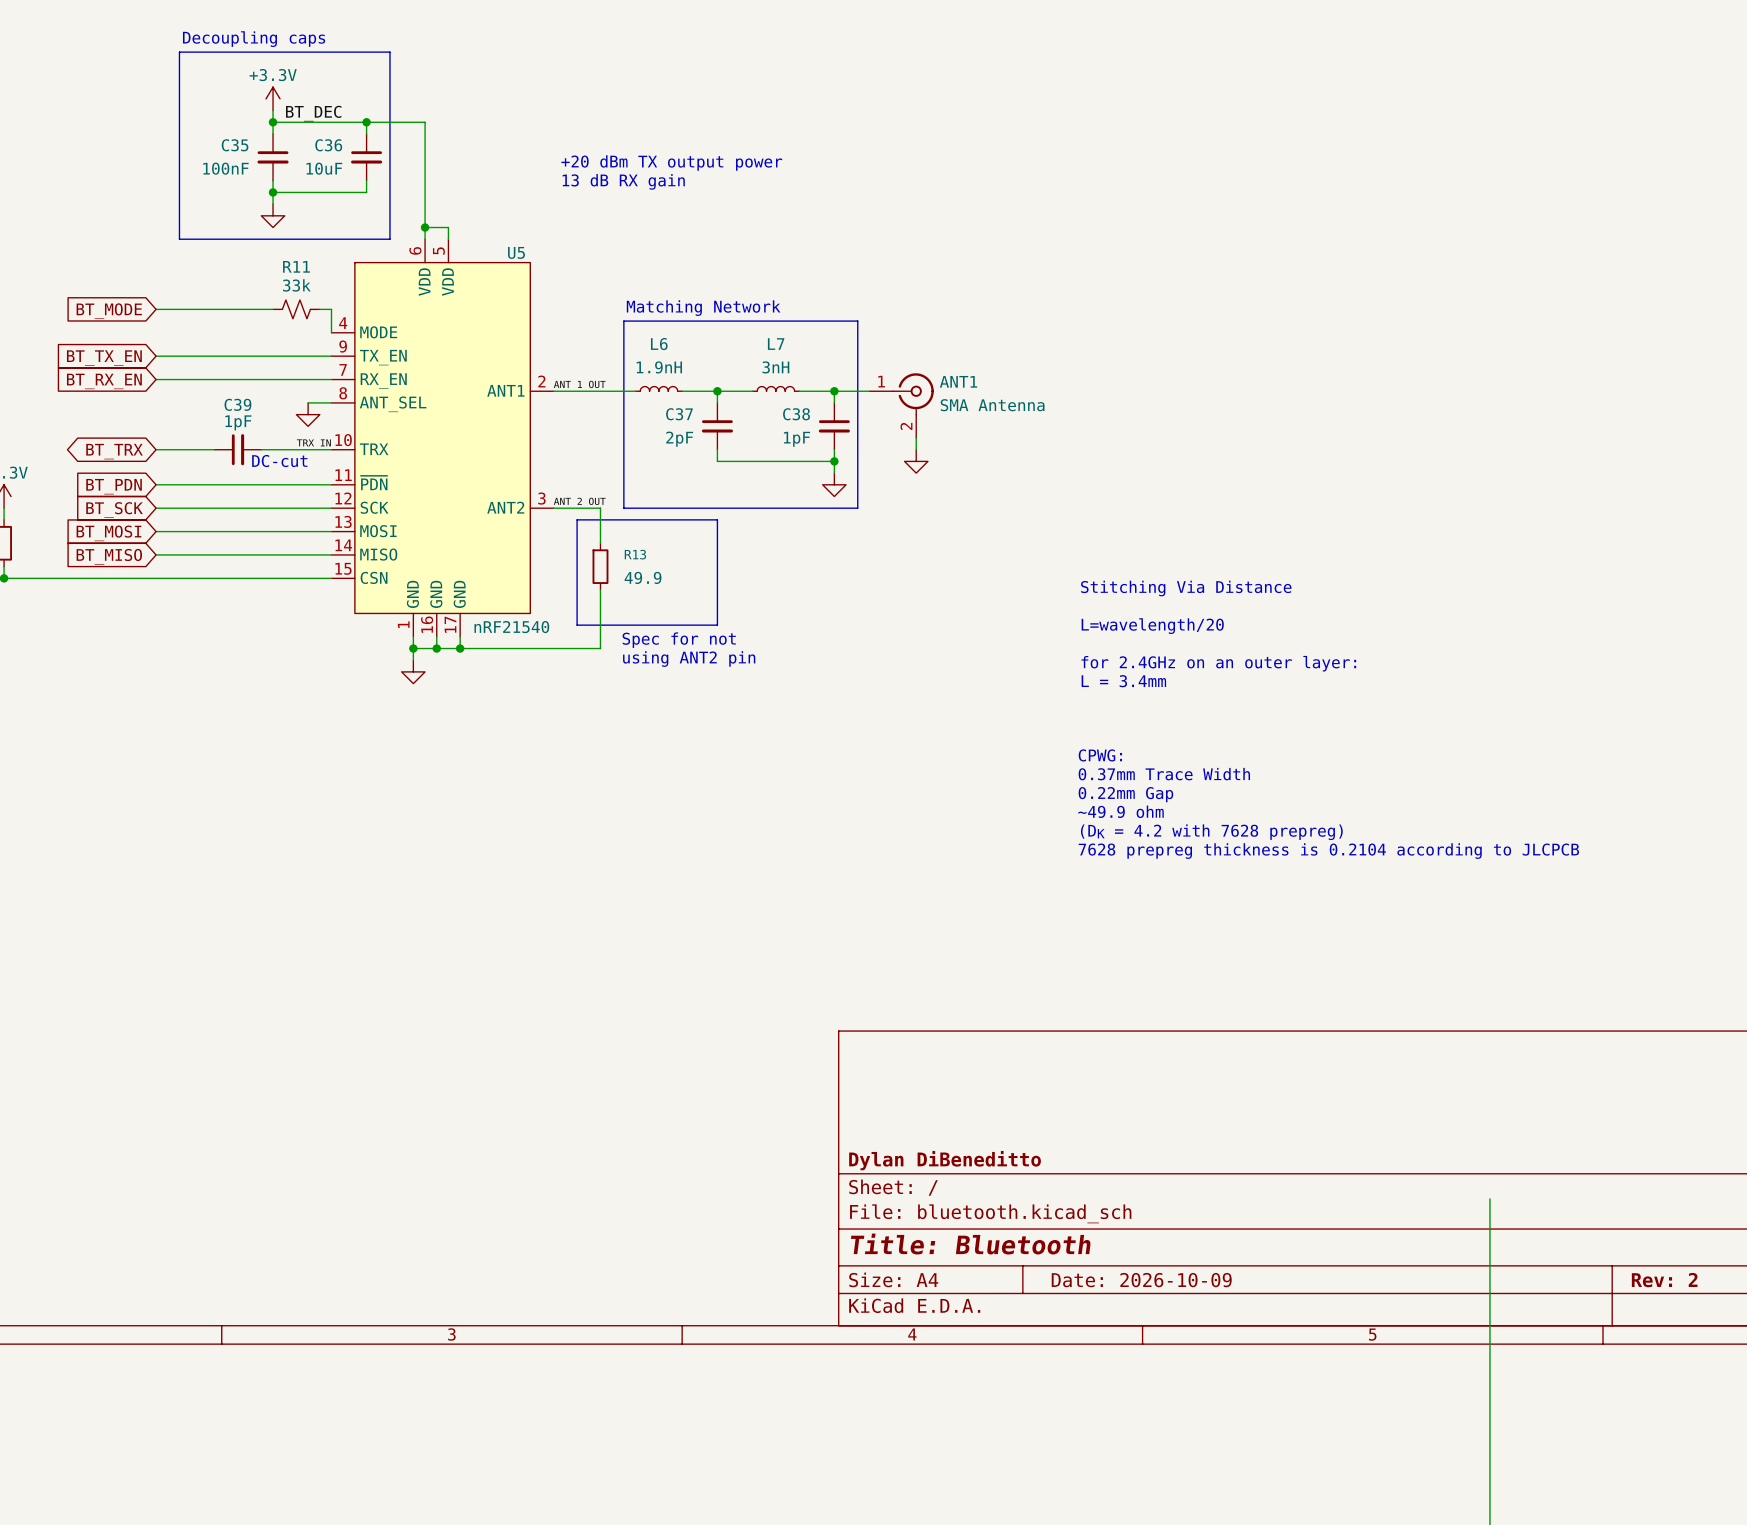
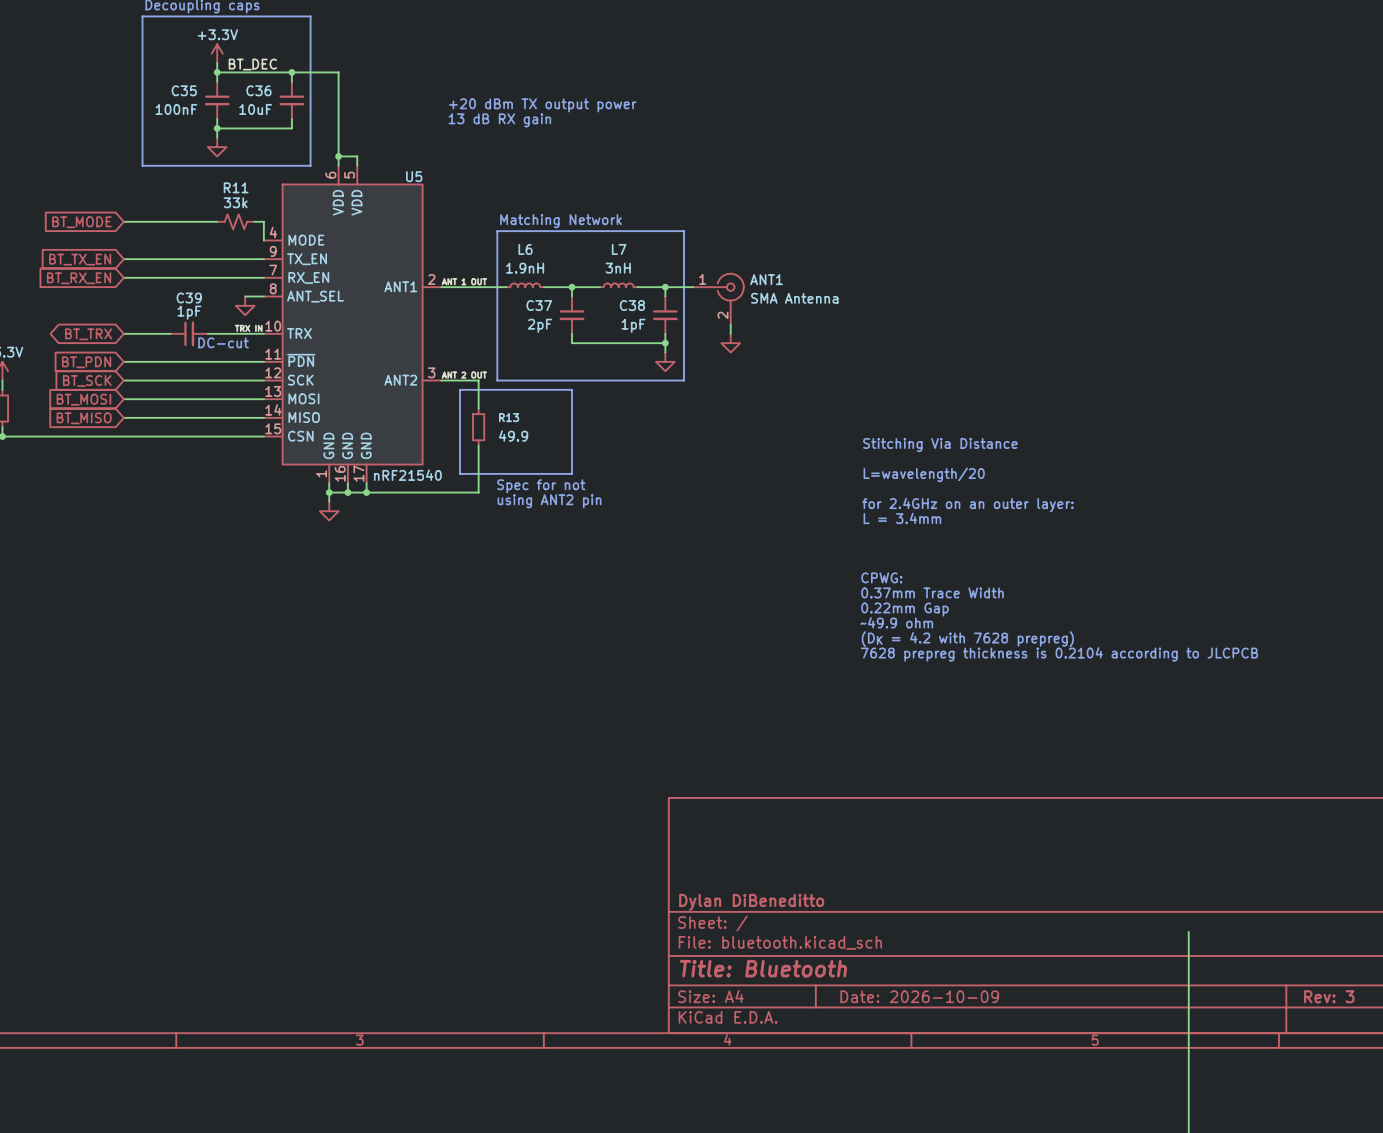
title block: Rev: 2 (1664, 1280) -> Rev: 3 (1329, 996)

